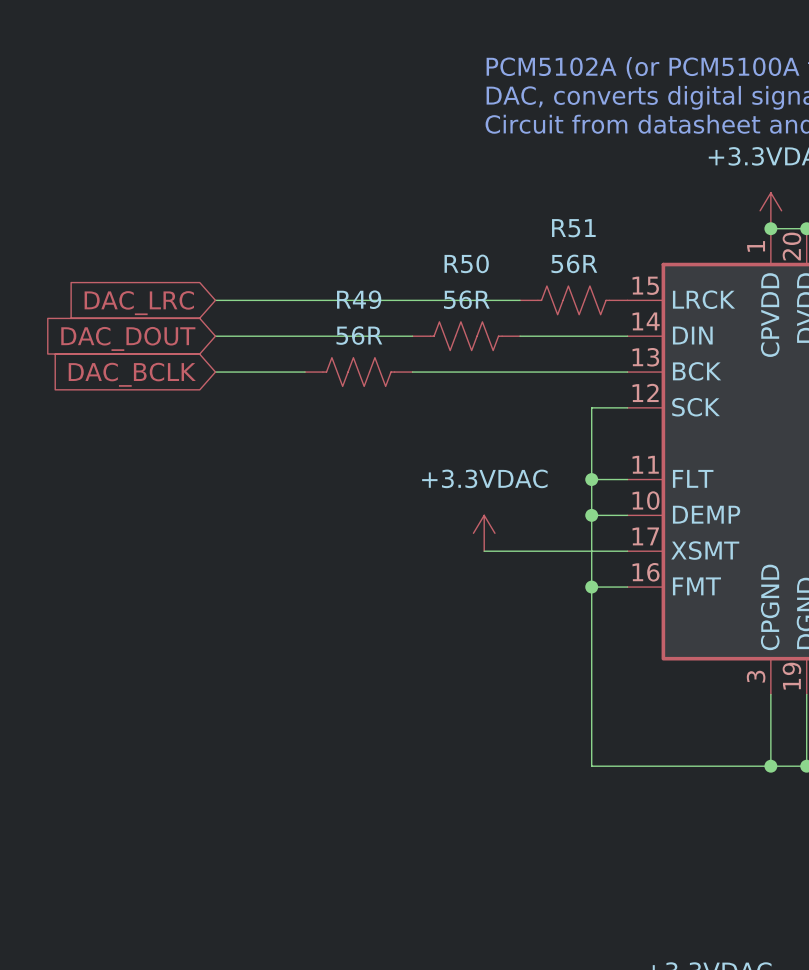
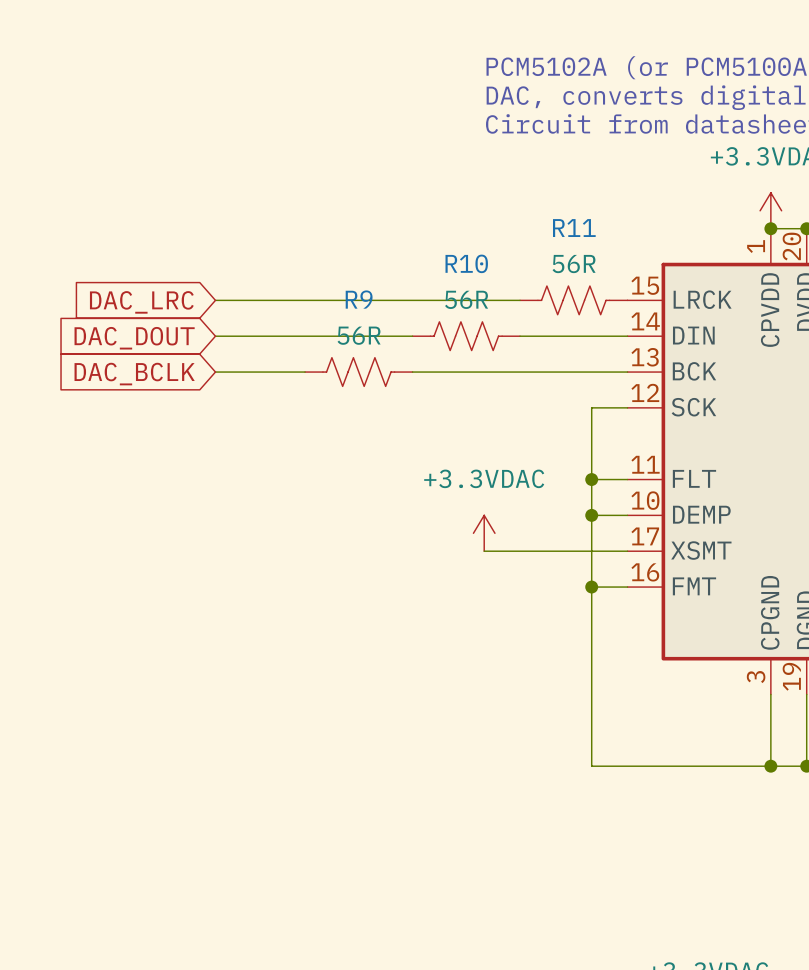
R51 name: R51 (573, 228) -> R11 (574, 228)
R50 name: R50 (466, 263) -> R10 (466, 263)
R49 name: R49 (359, 299) -> R9 (359, 299)

